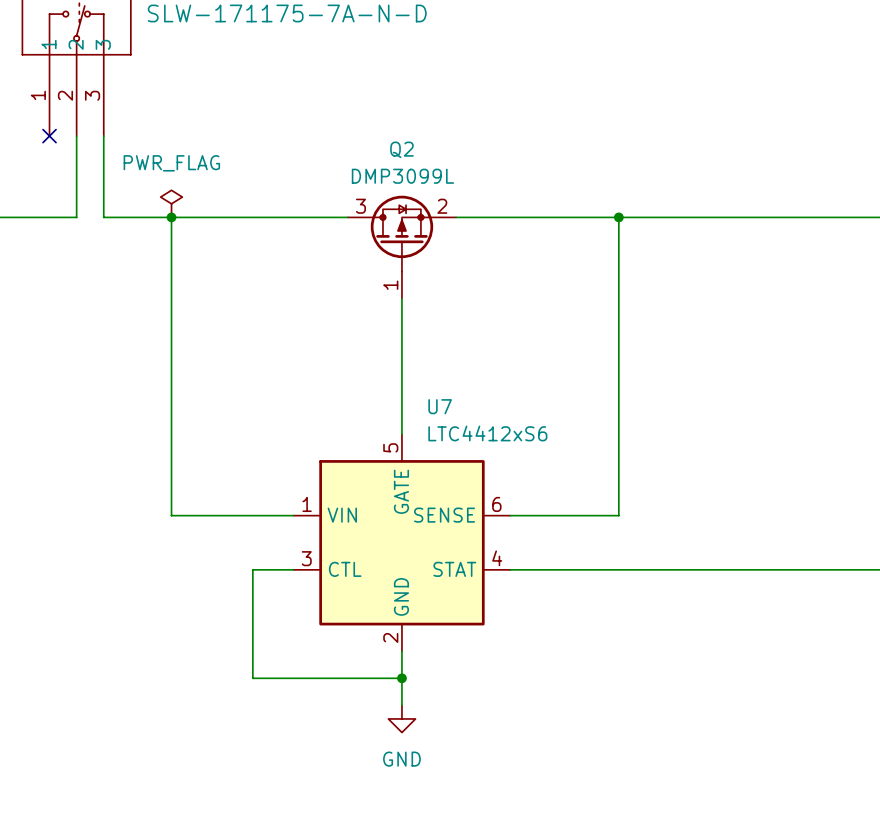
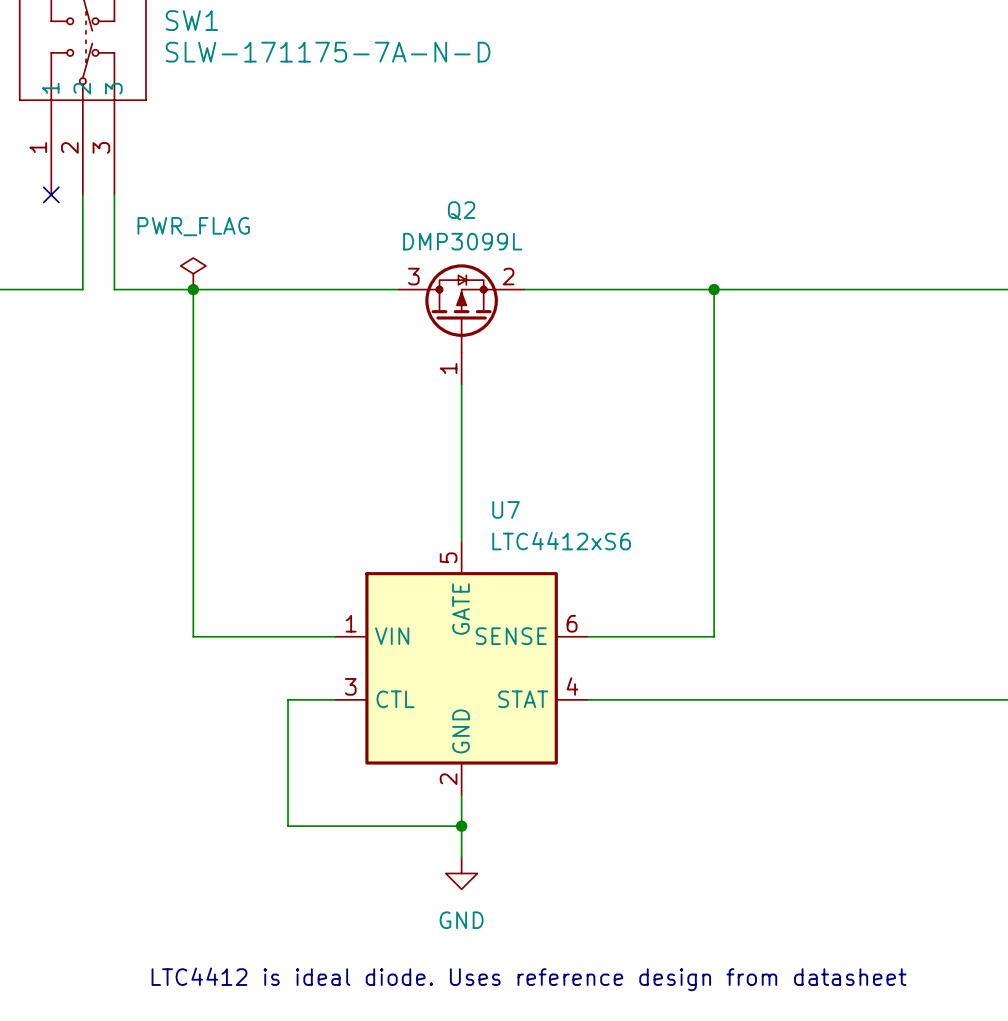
text: none -> LTC4412 is ideal diode. Uses reference design from datasheet (529, 979)

